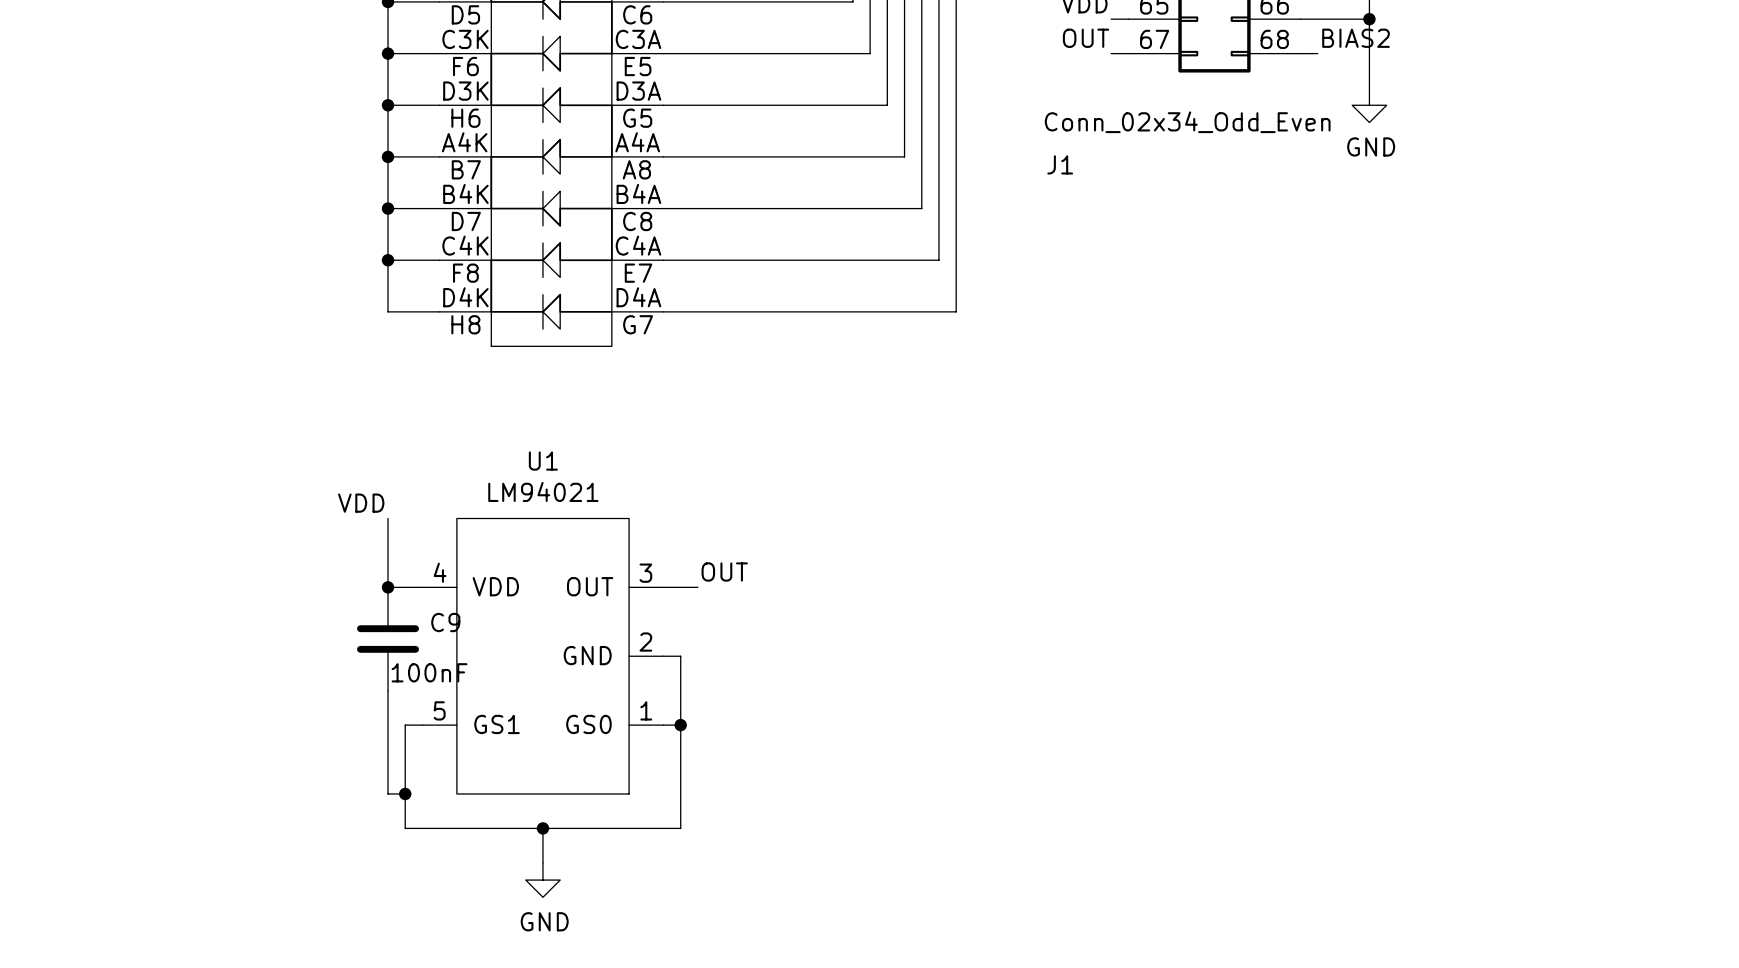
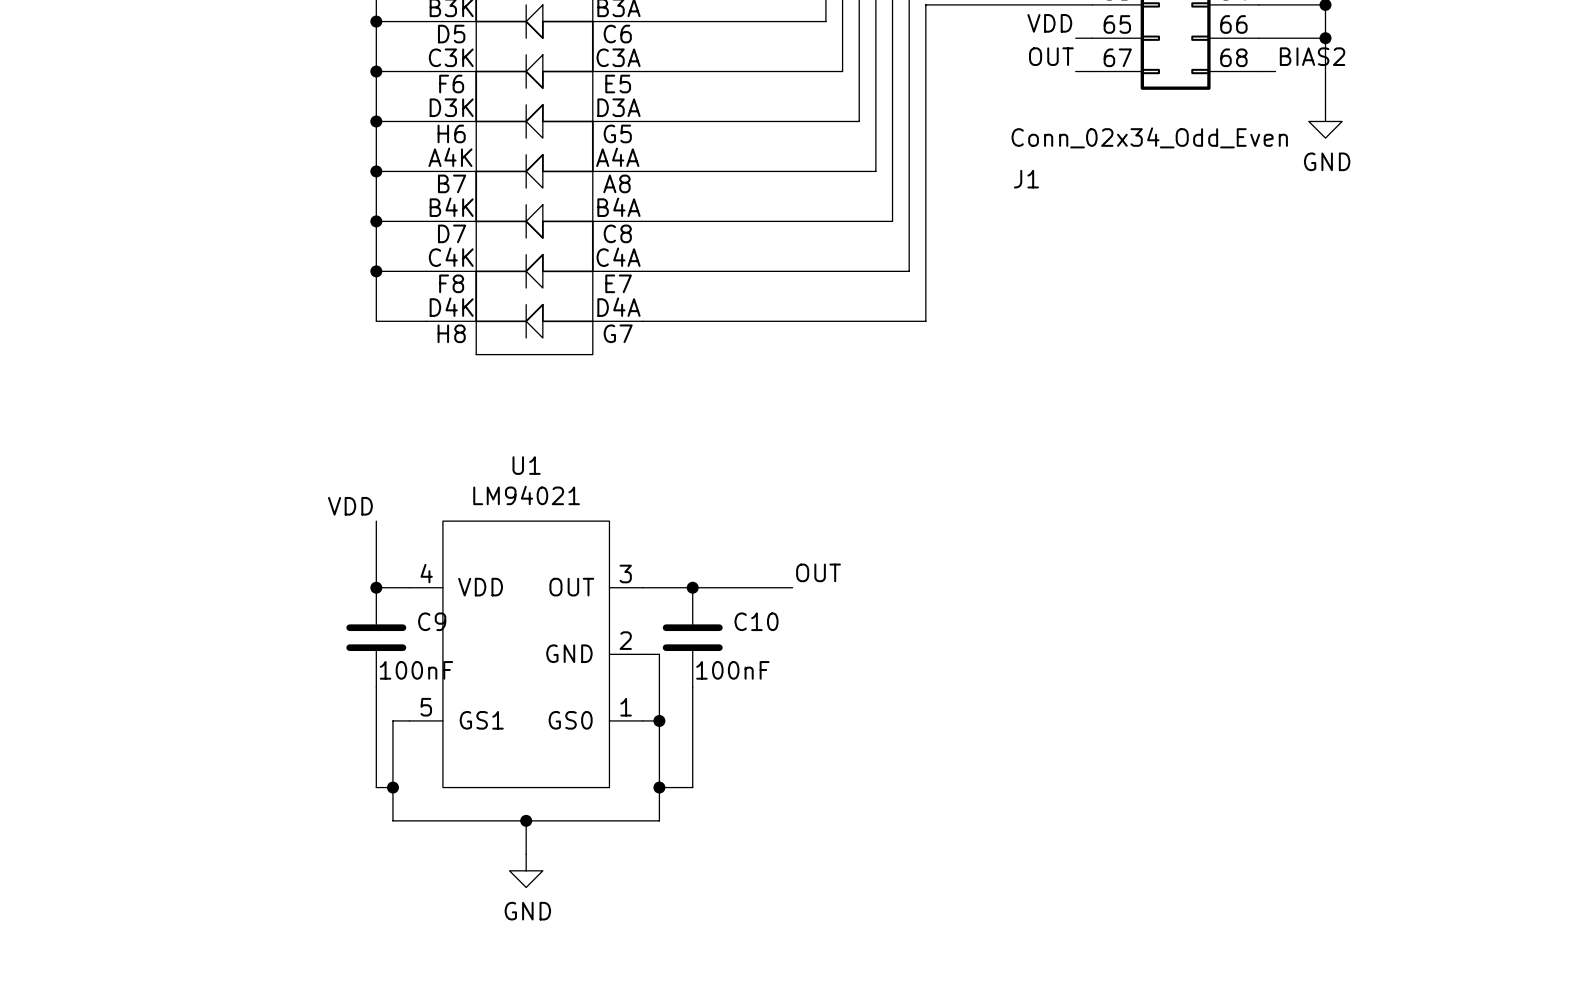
label position: OUT (724, 572) -> OUT (818, 572)
wire: none -> (676, 587) (792, 587)
junction: none -> (692, 587)
C10: none -> 100nF (692, 637)
wire: none -> (692, 687) (692, 787) (659, 787)
junction: none -> (659, 787)

